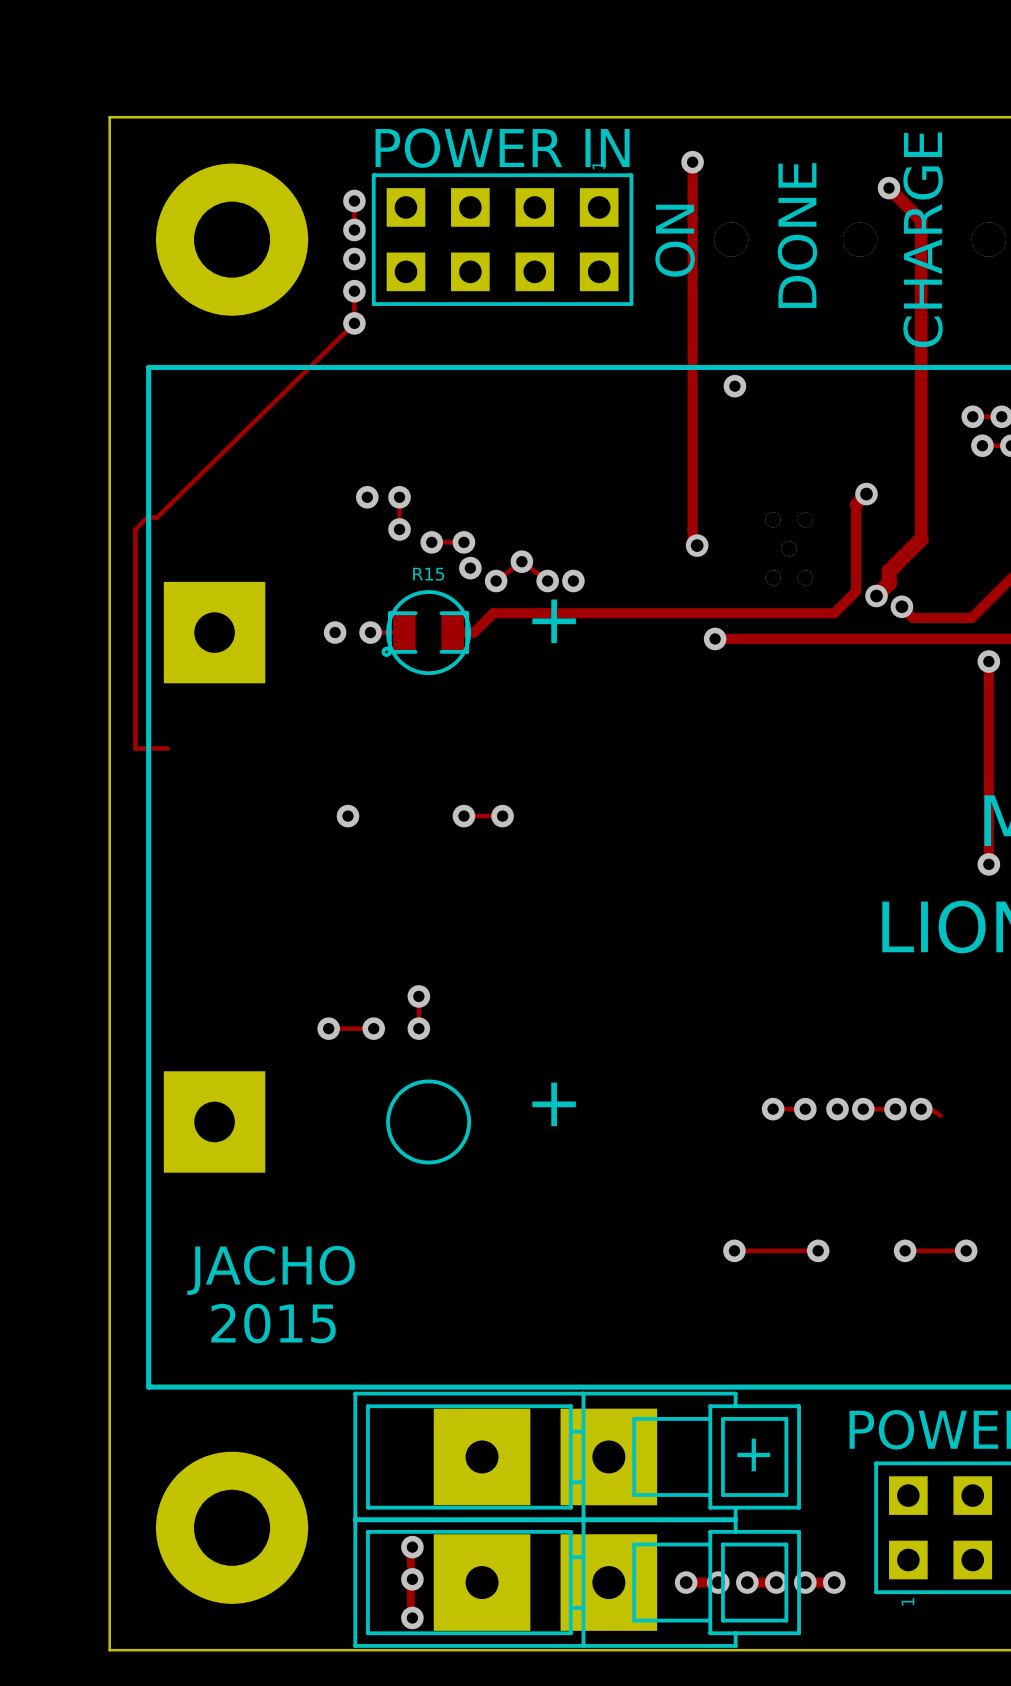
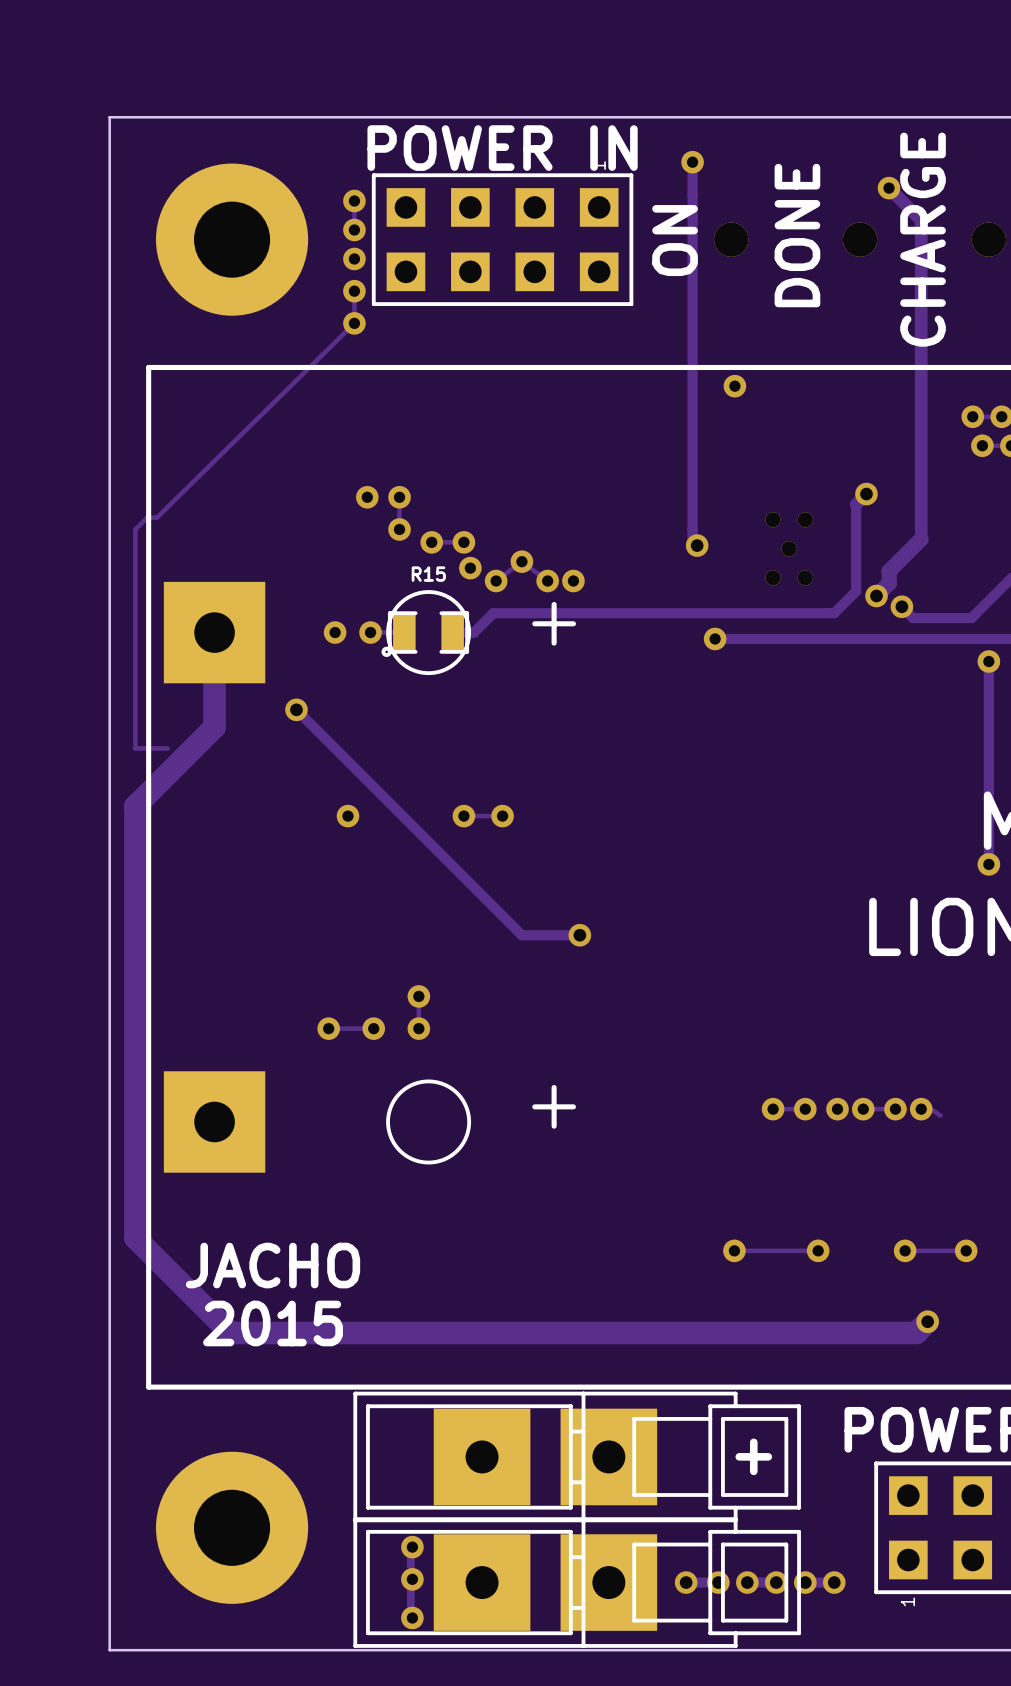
track: none -> (214, 632) (214, 727) (135, 806) (135, 1237) (230, 1332) (916, 1332) (927, 1321)
track: none -> (296, 709) (521, 935) (579, 935)
via: none -> (296, 709)
via: none -> (579, 935)
via: none -> (927, 1321)

